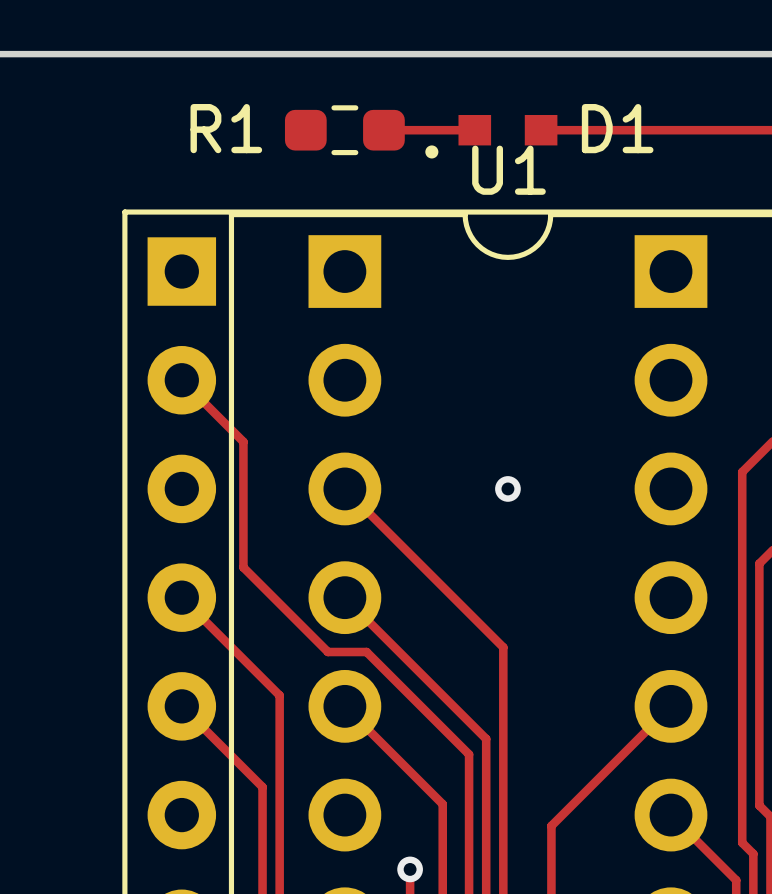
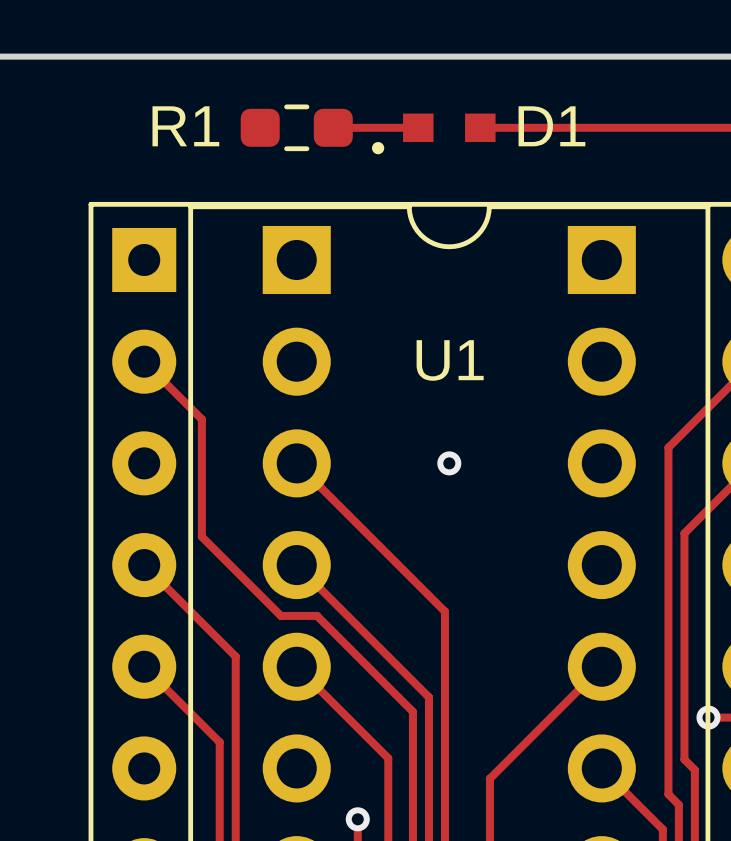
U1 name position: U1 (508, 170) -> U1 (450, 360)

